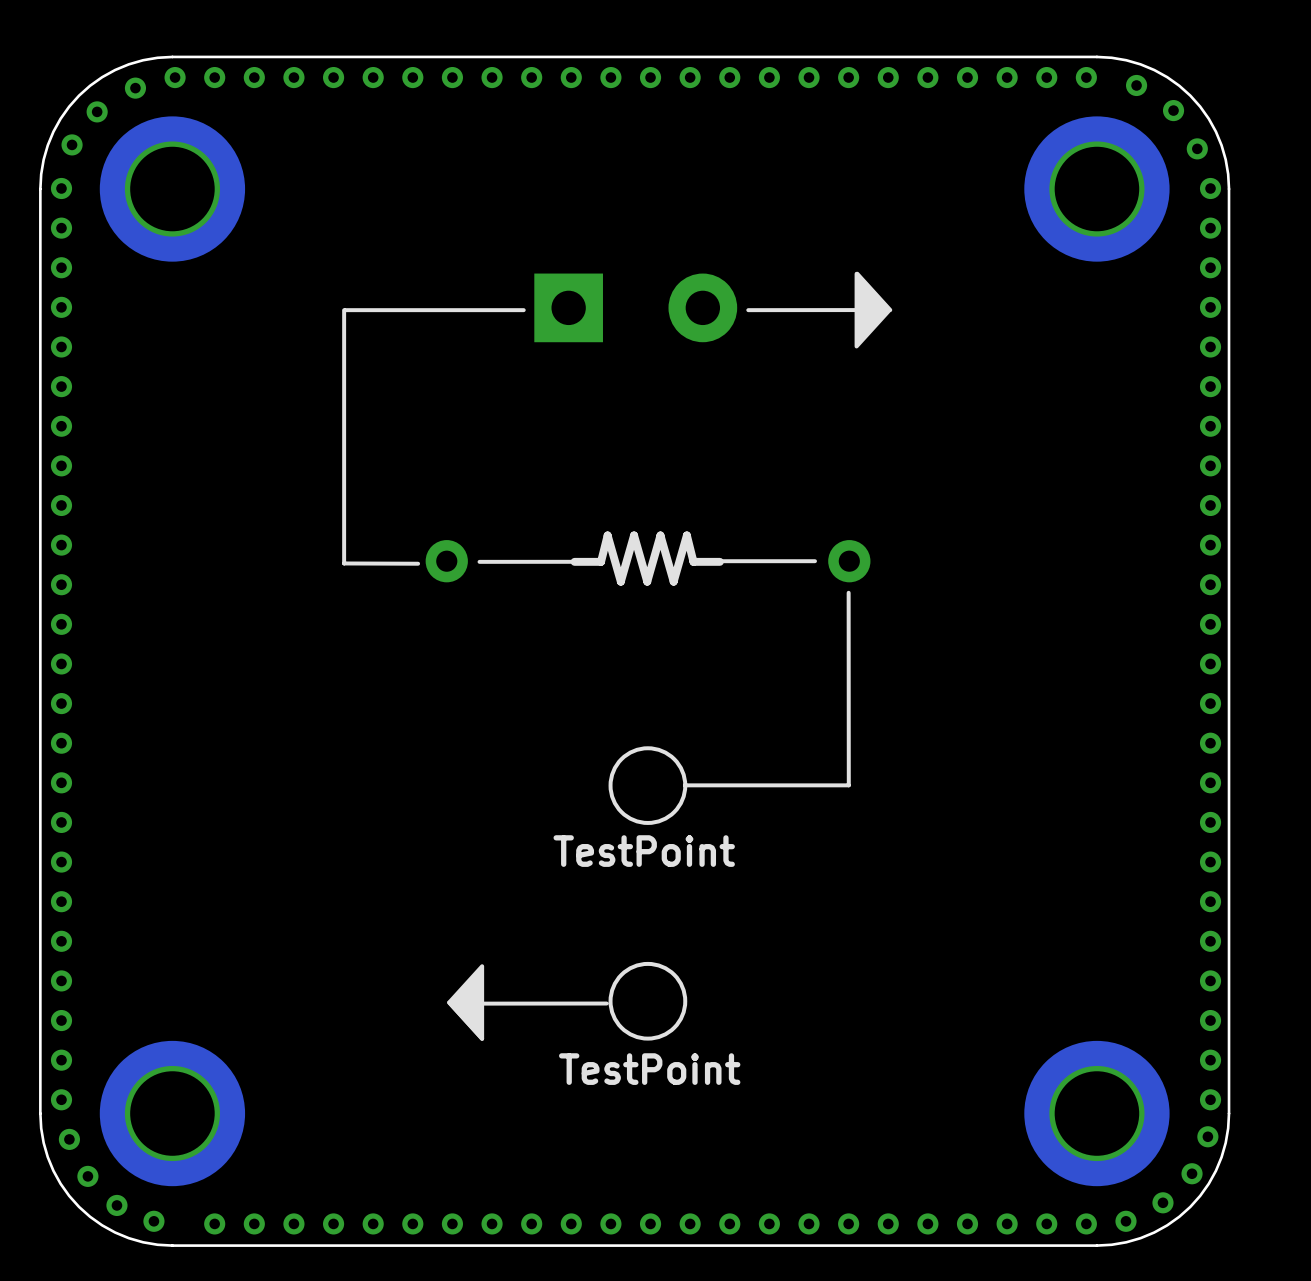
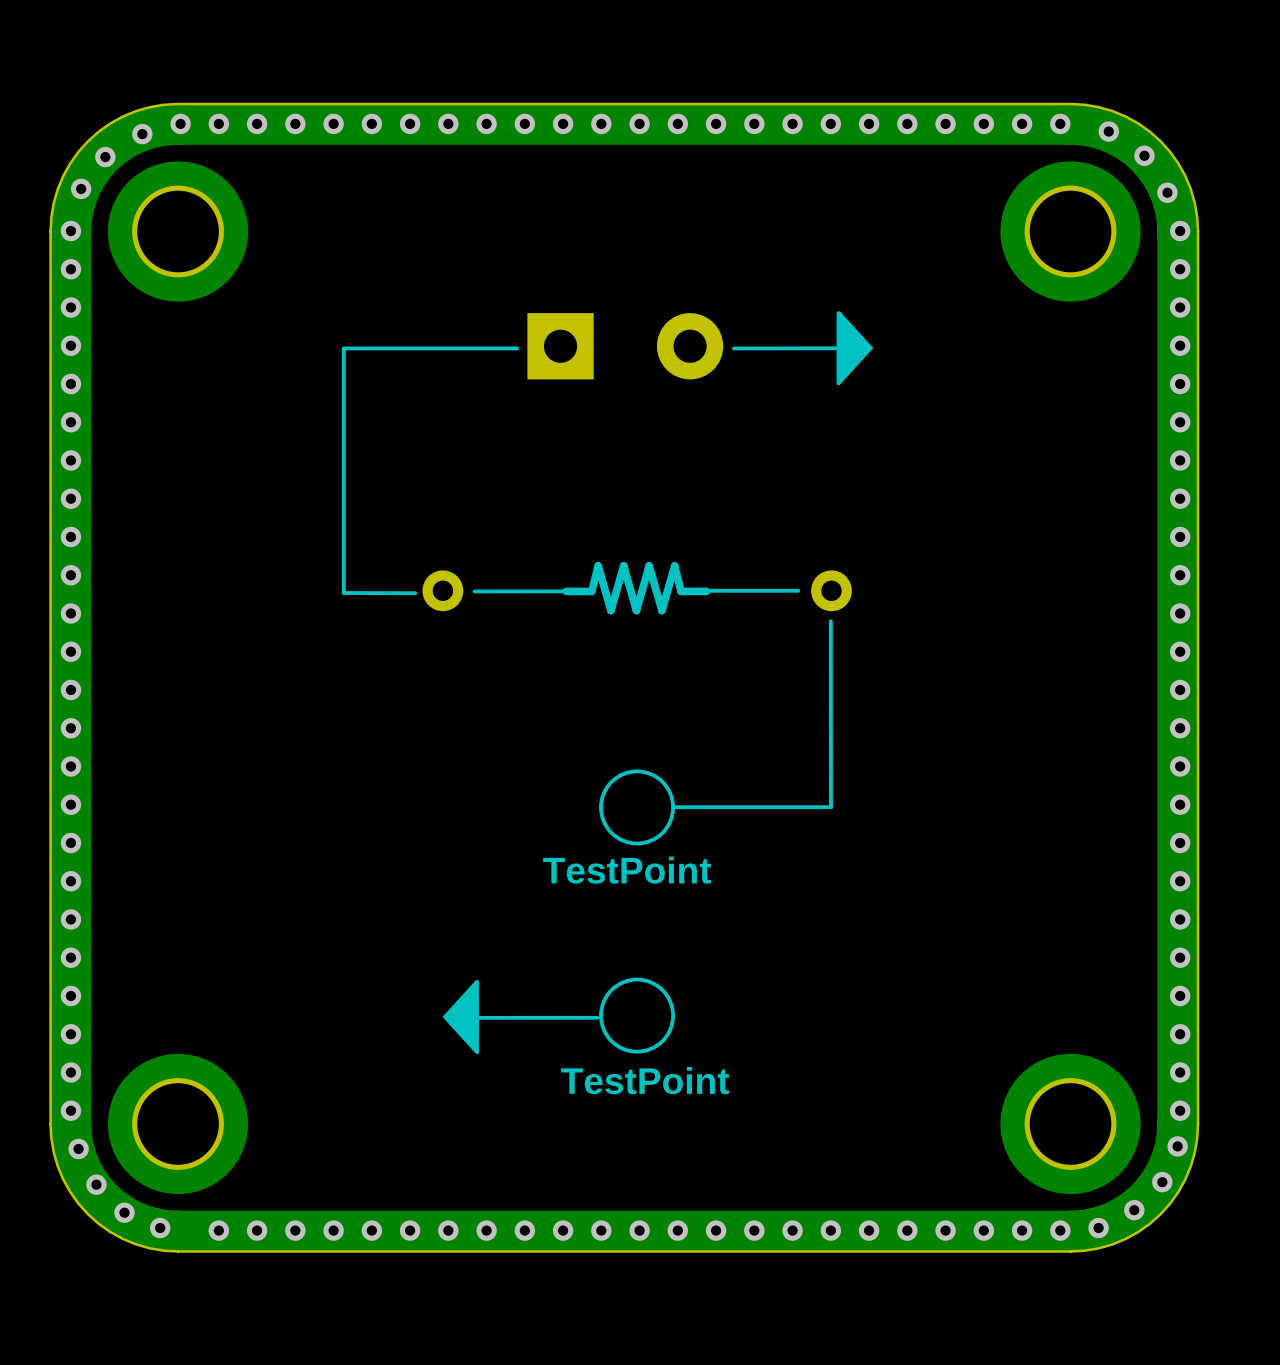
track: none -> (1070, 124) (178, 124) (154, 127) (131, 135) (111, 147) (94, 164) (76, 196) (70, 231) (70, 1123) (73, 1147) (81, 1170) (94, 1190) (111, 1207) (142, 1225) (178, 1231) (1070, 1231) (1094, 1228) (1117, 1220) (1137, 1207) (1154, 1190) (1171, 1159) (1177, 1123) (1176, 219) (1167, 185) (1154, 164) (1137, 147) (1105, 130) (1070, 124)

